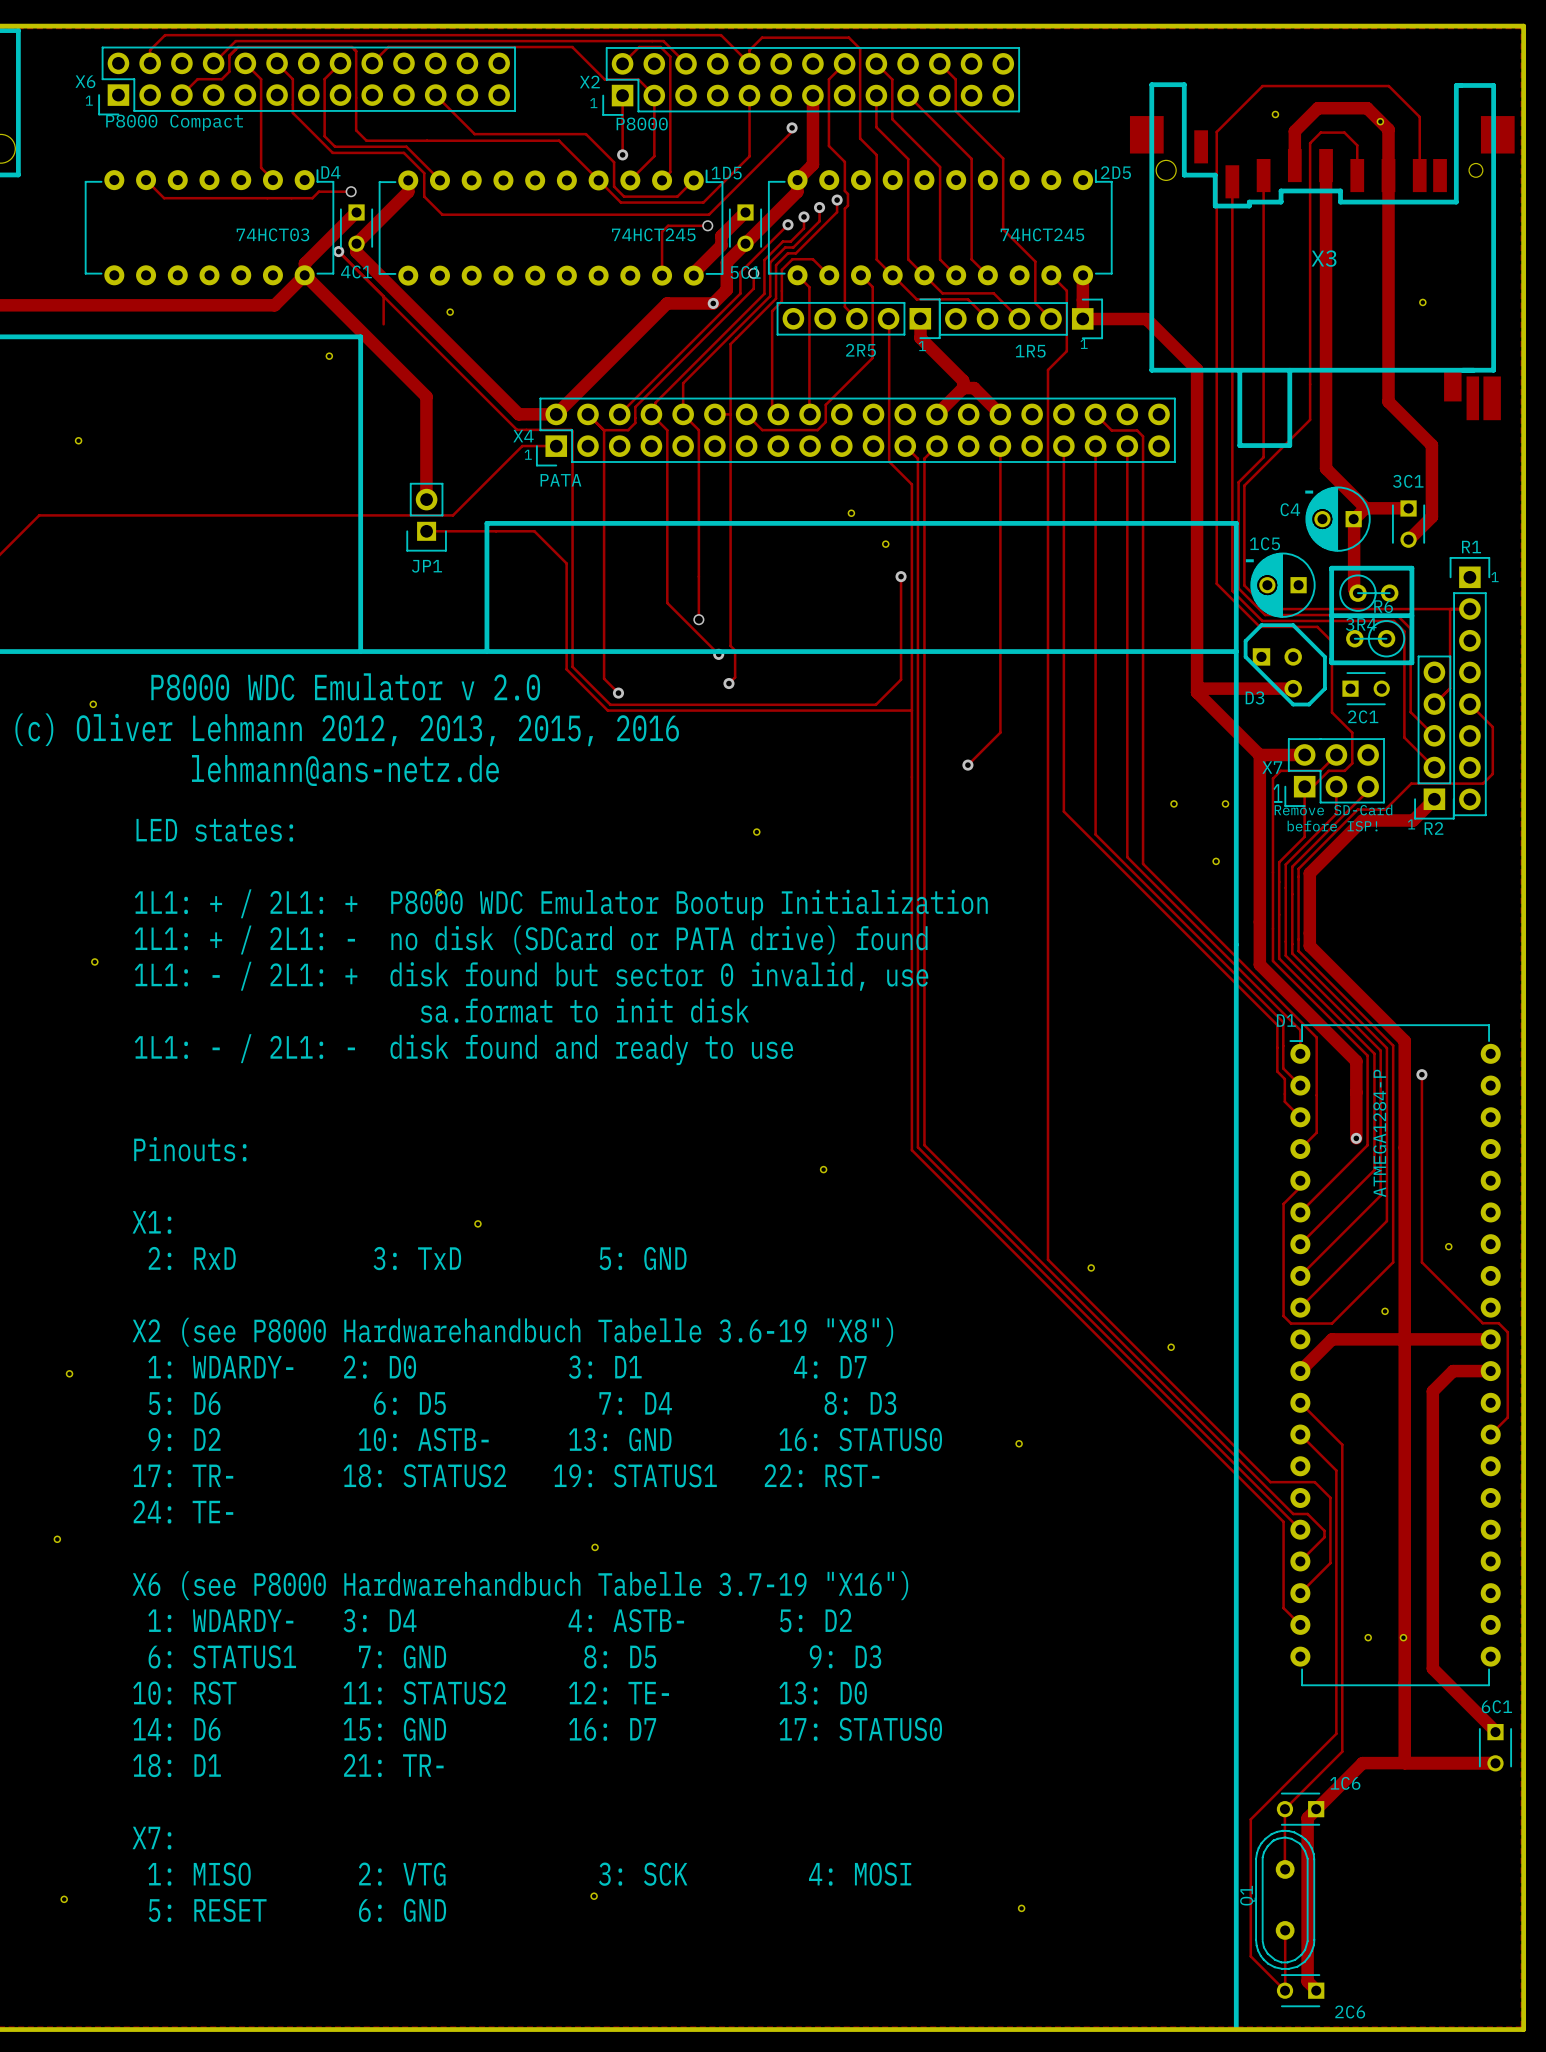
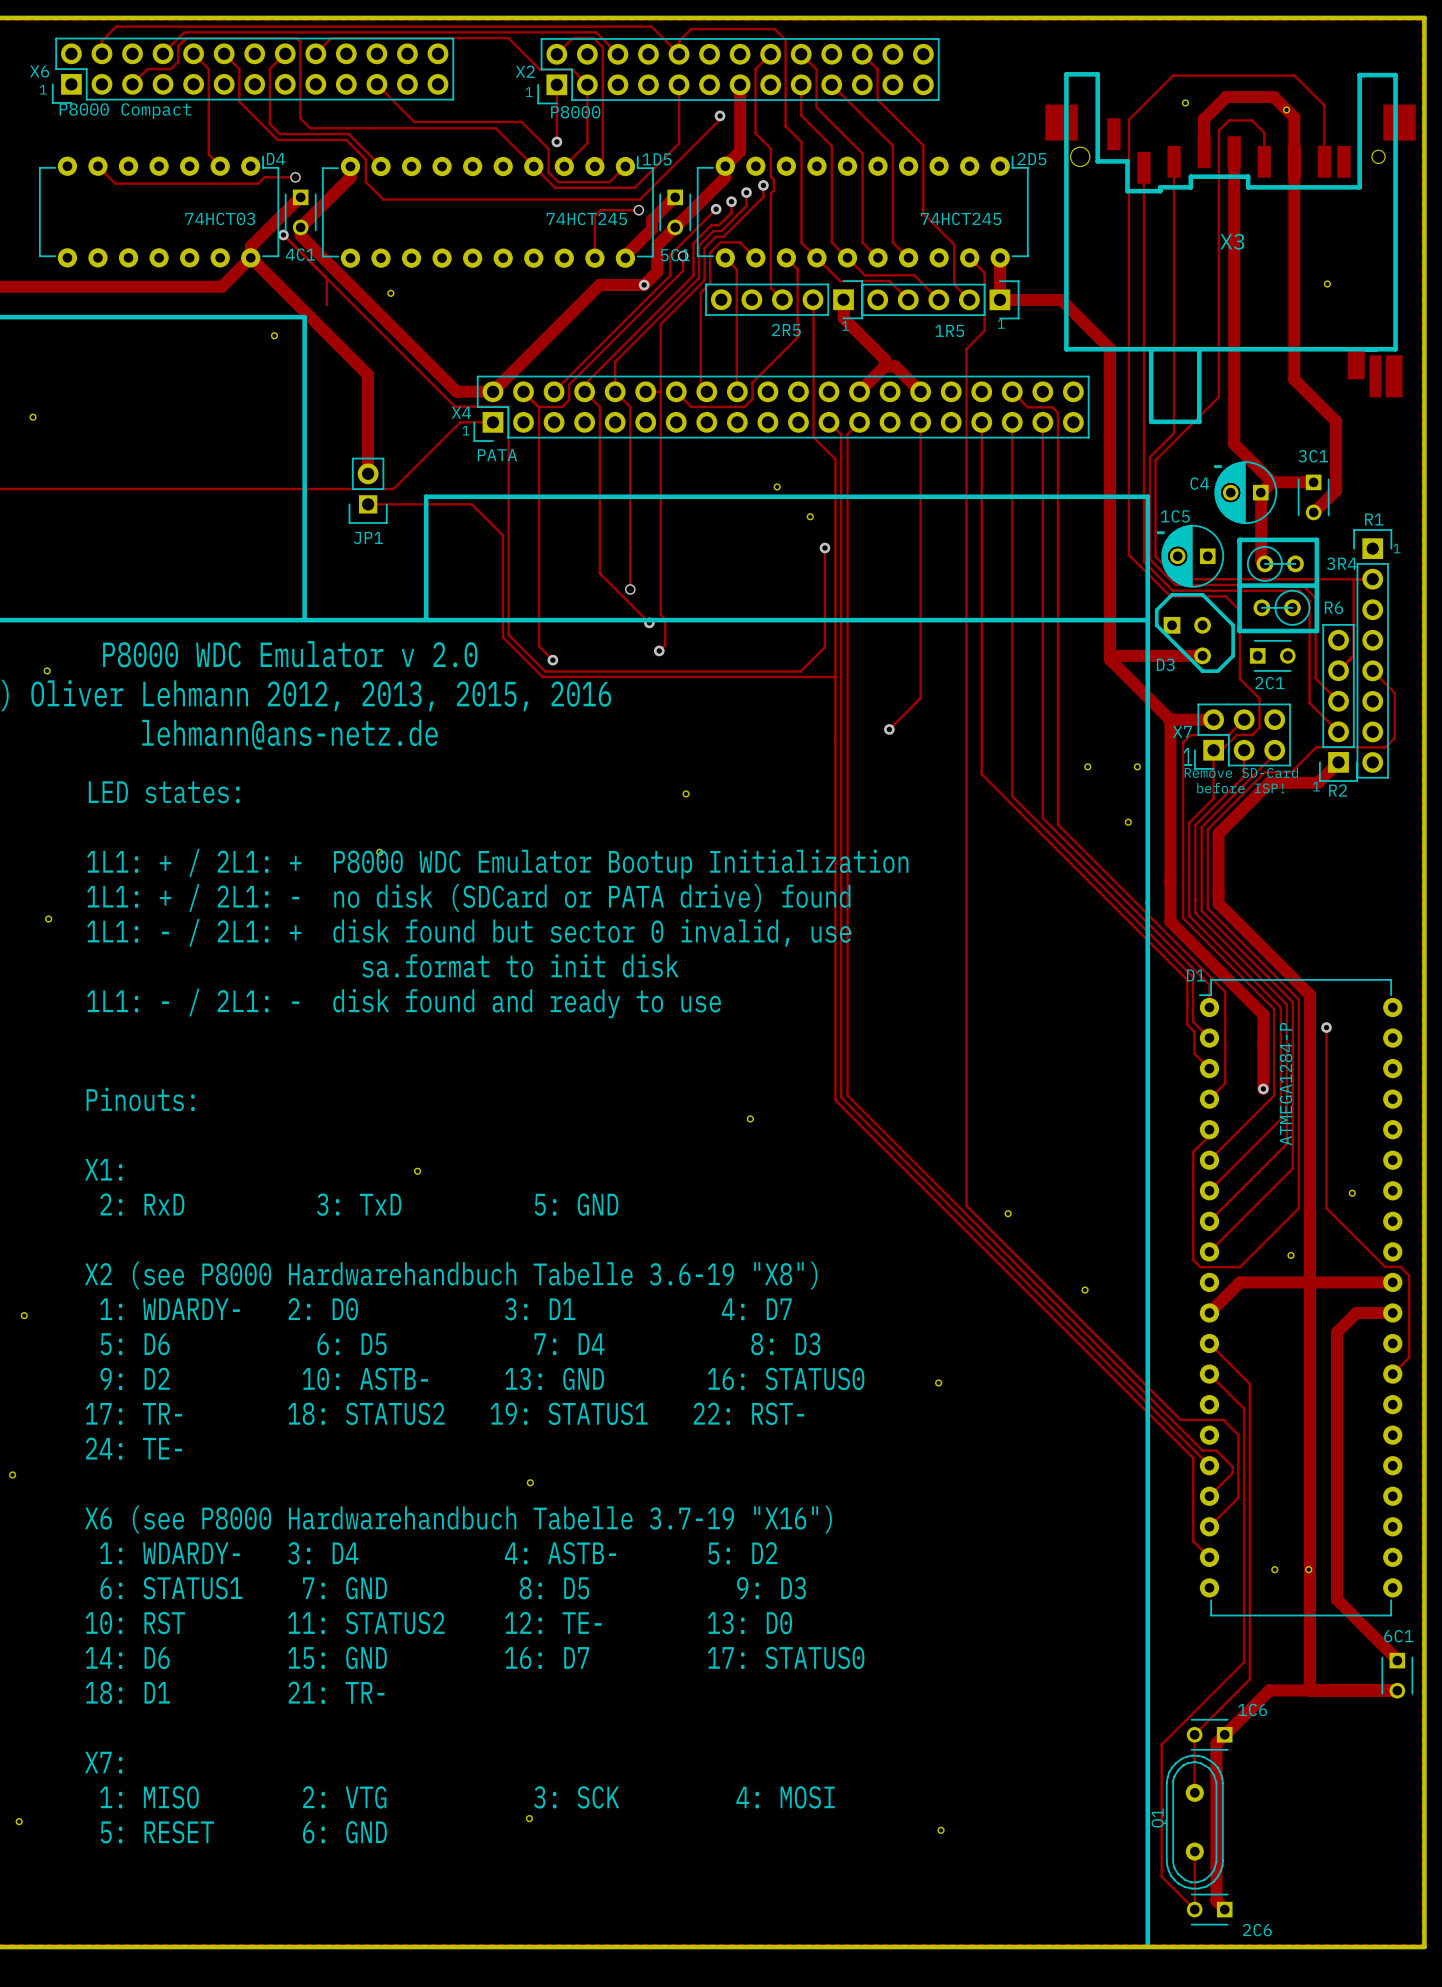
R6 name position: R6 (1383, 606) -> R6 (1333, 607)
3R4 name position: 3R4 (1361, 624) -> 3R4 (1341, 563)

